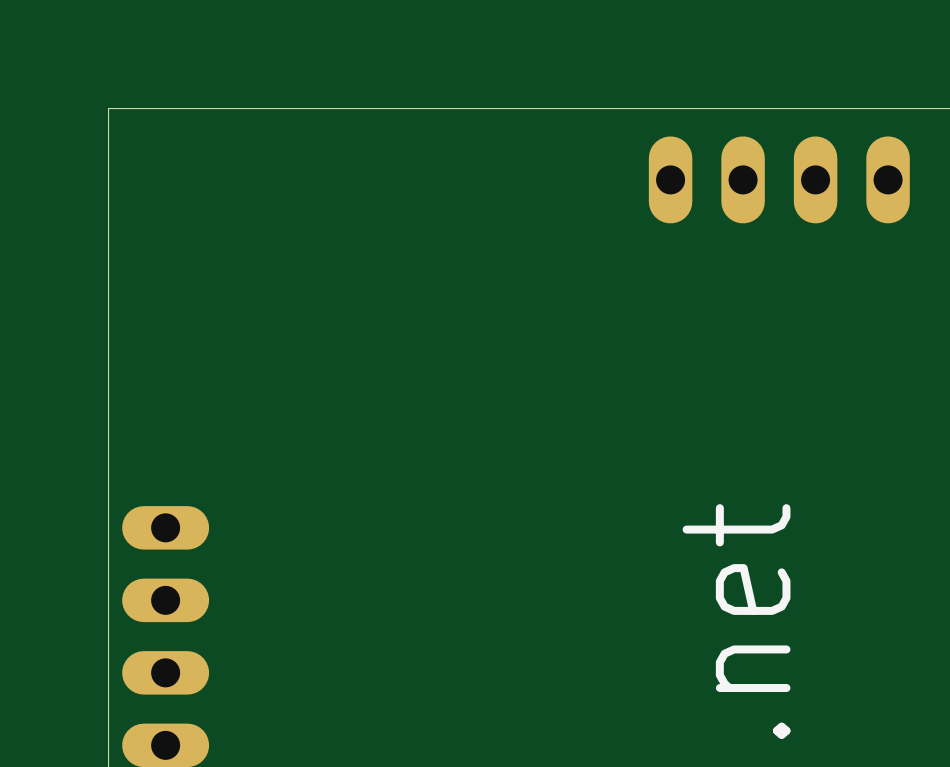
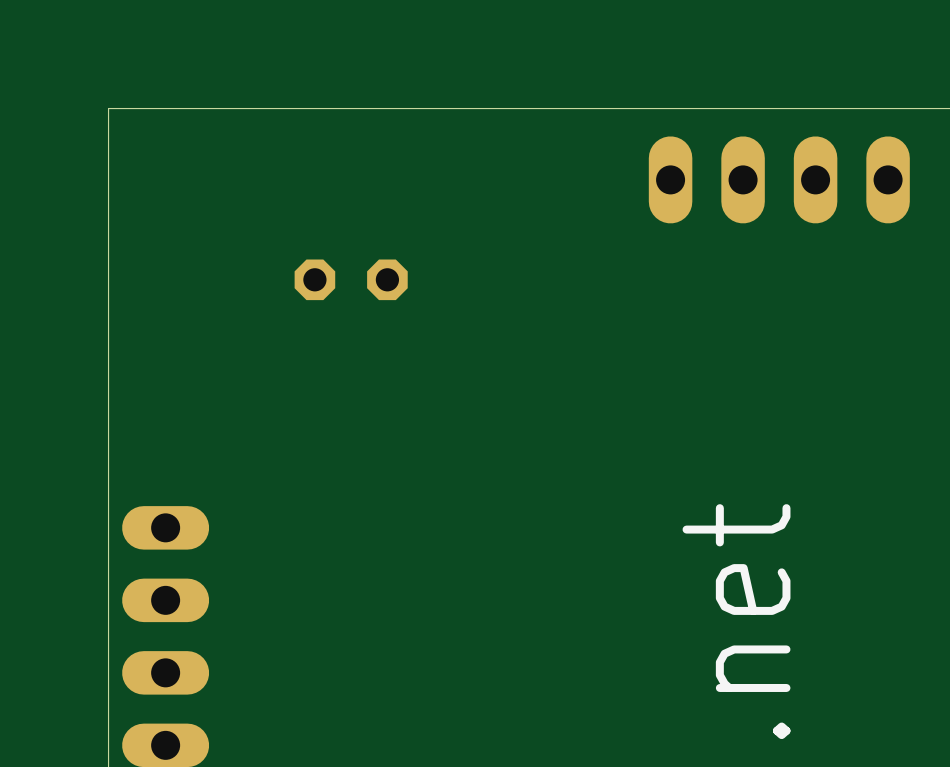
part: none -> (351, 279)

